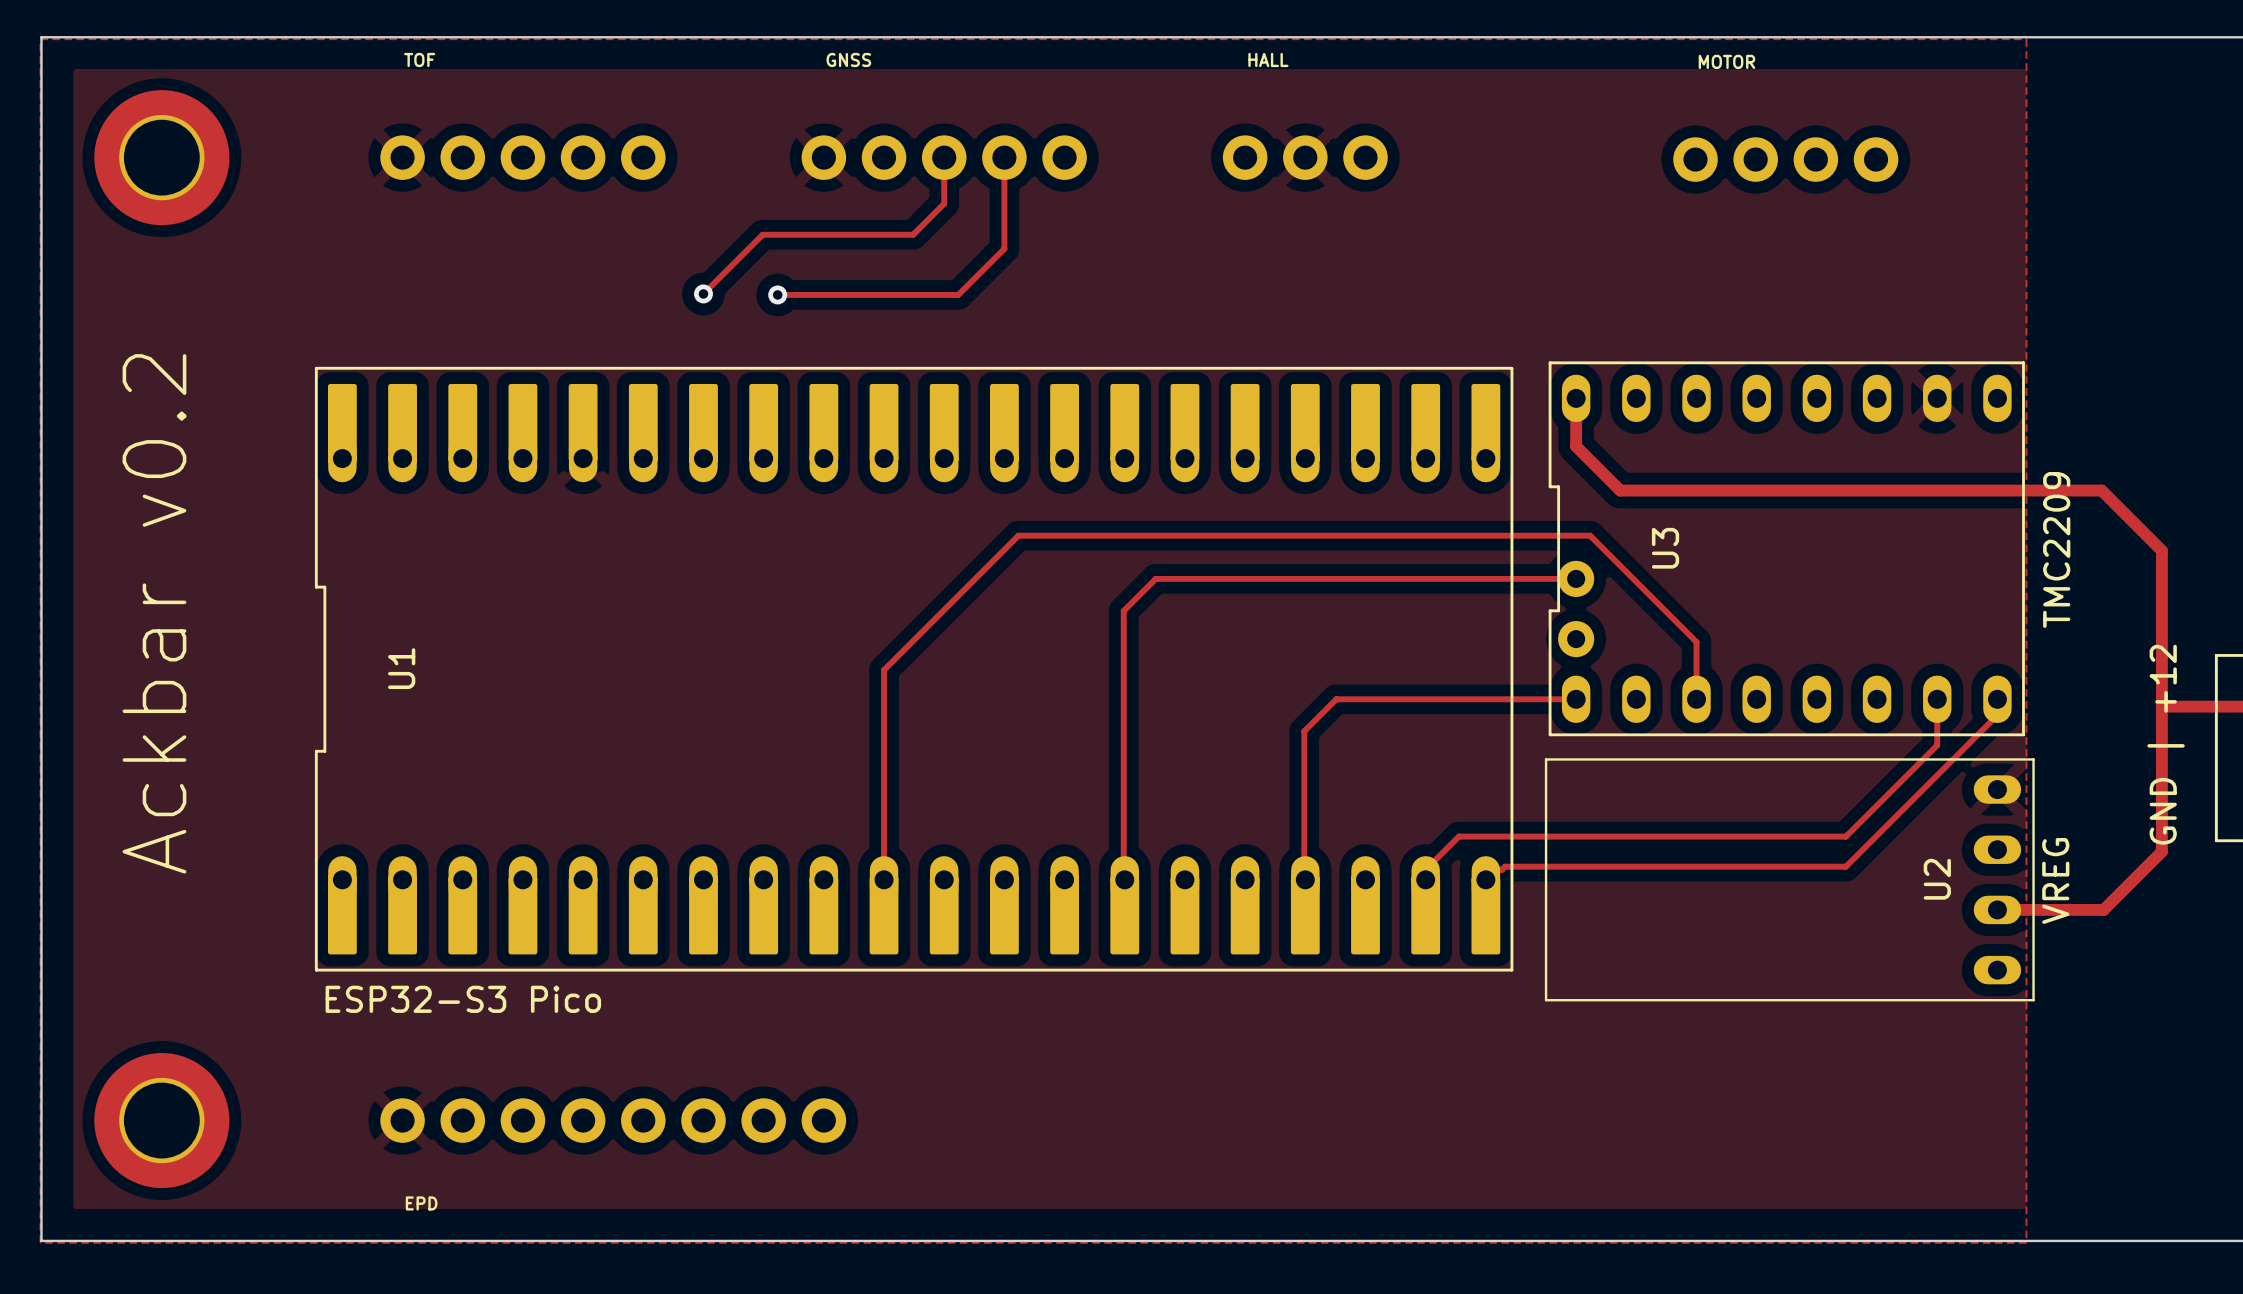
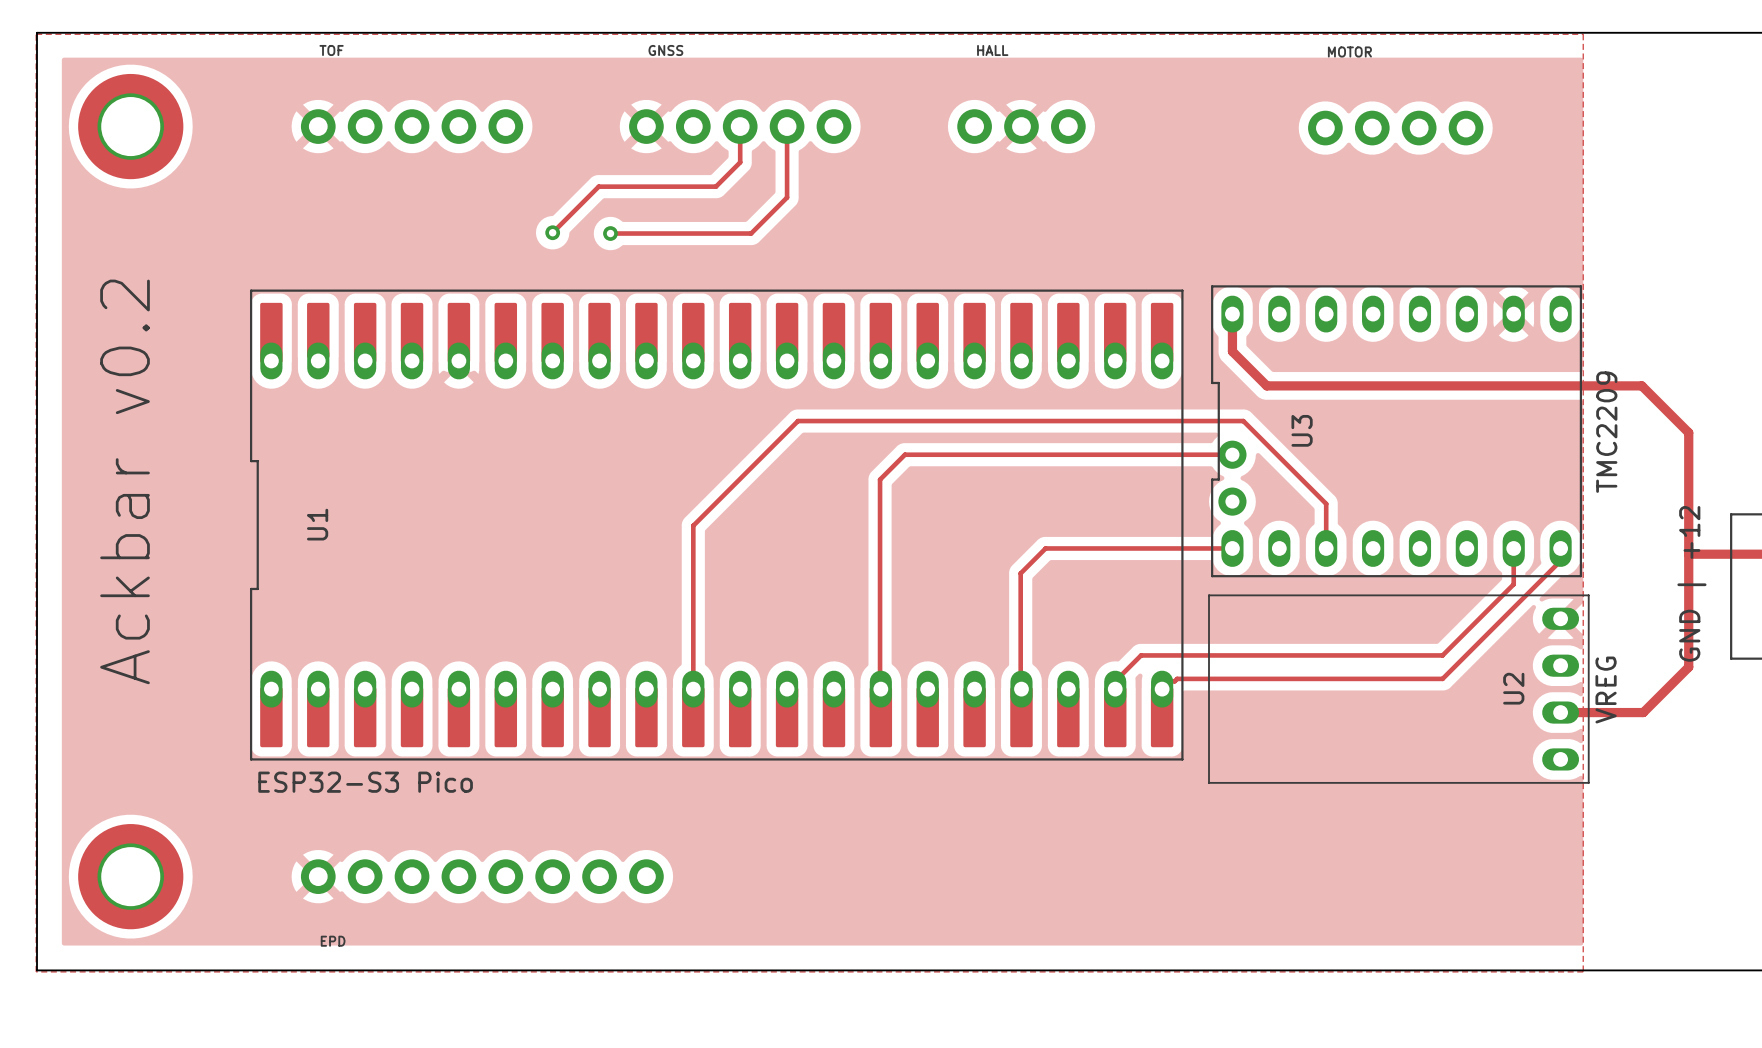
U1 footprint: [314, 366, 1514, 972] -> [249, 289, 1184, 761]

